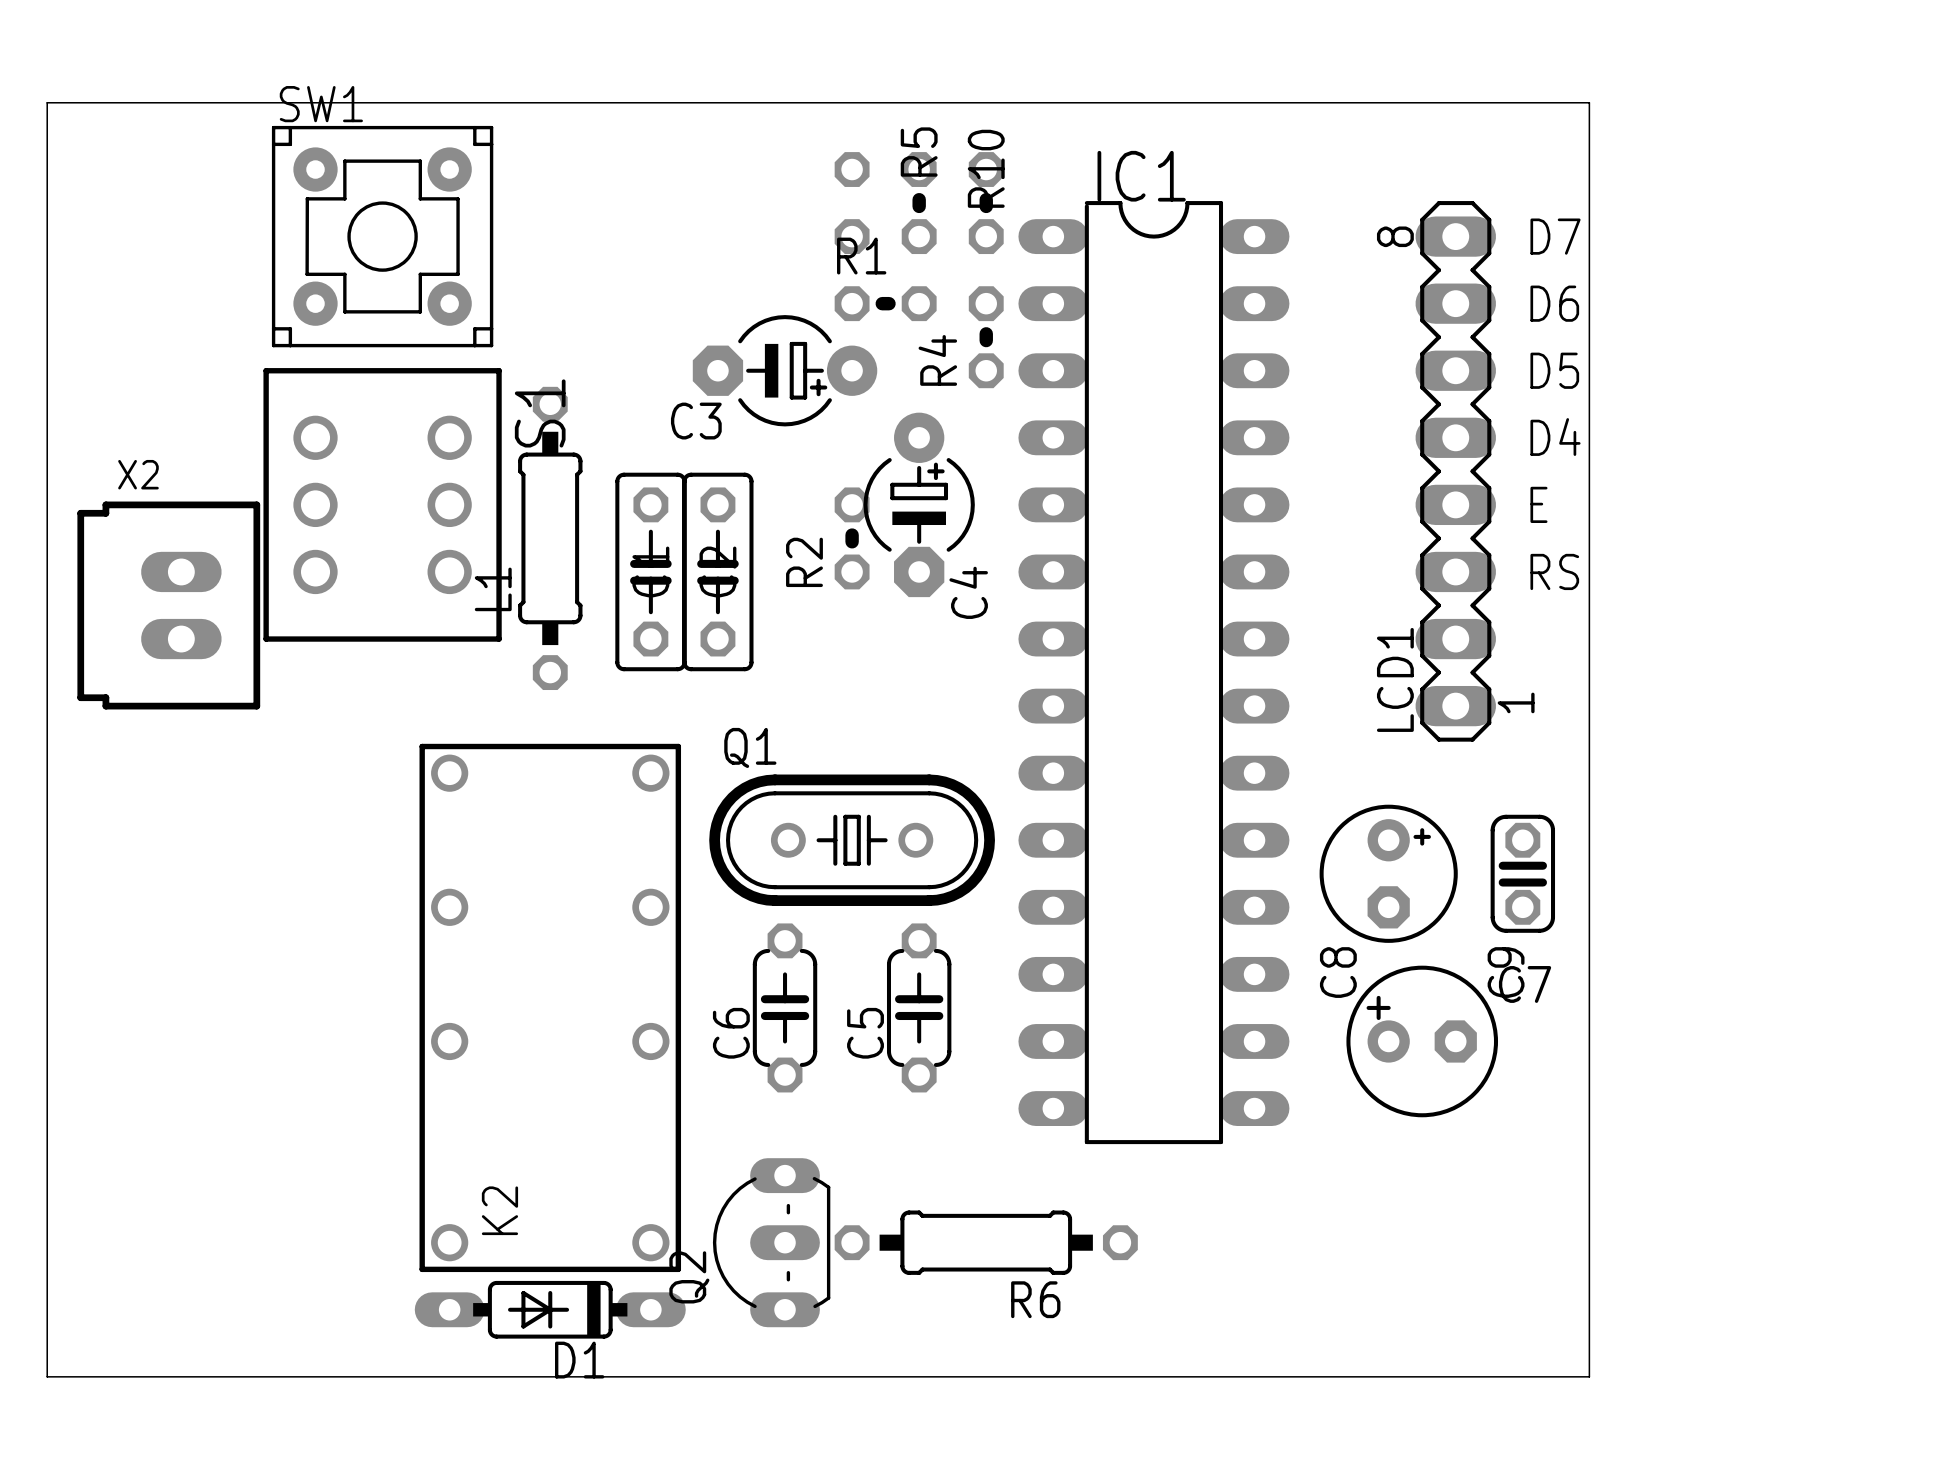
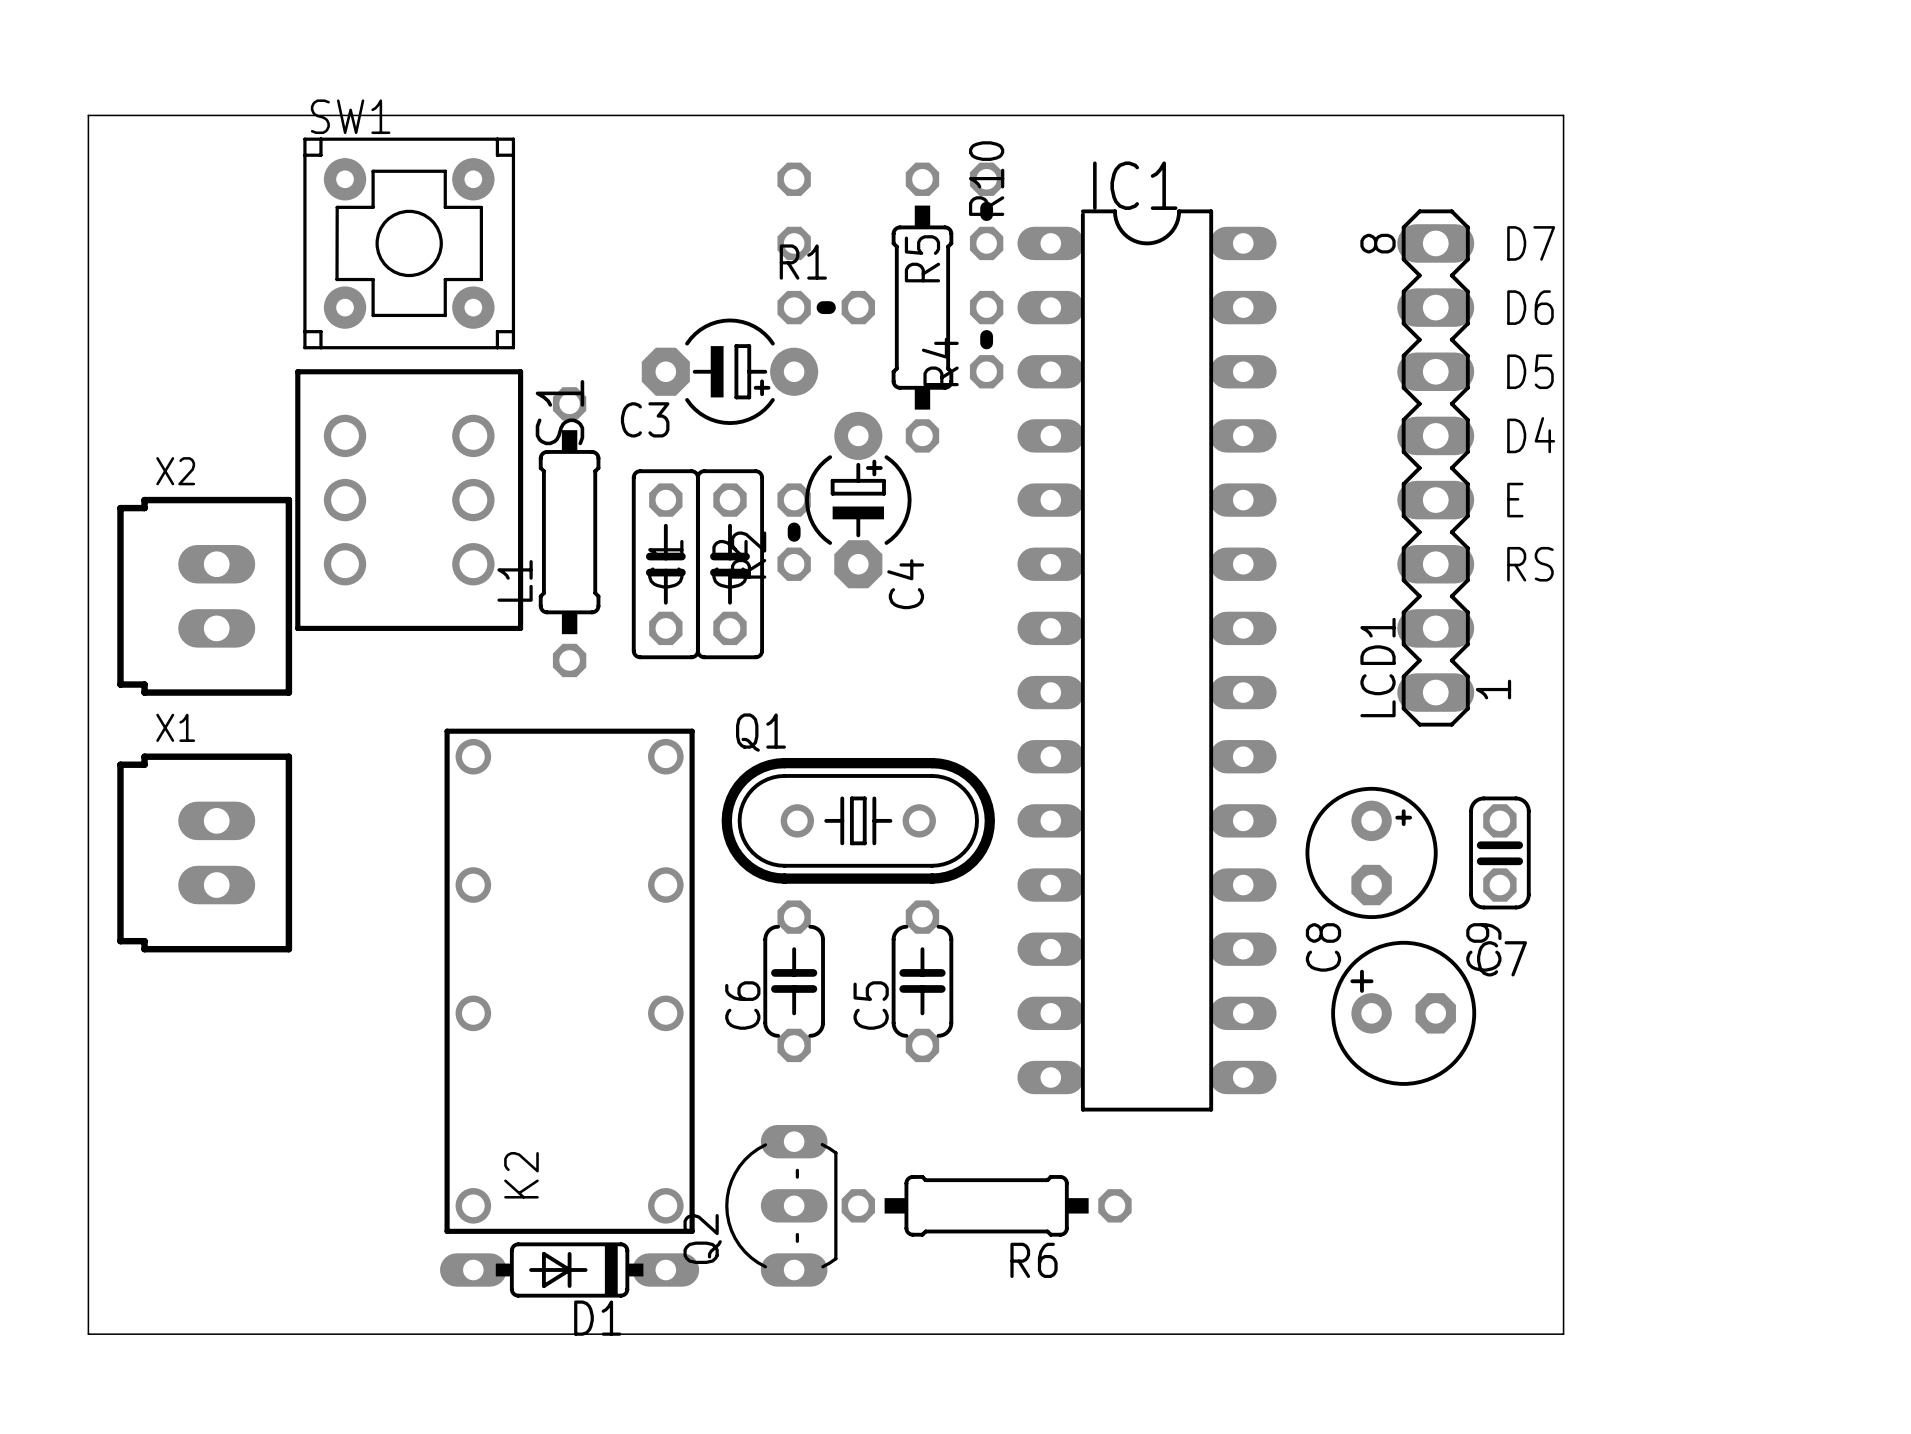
R5 footprint: [901, 152, 937, 255] -> [891, 162, 954, 453]
part position: (852, 203) -> (794, 211)
R1 position: (885, 303) -> (826, 307)
C3 position: (785, 370) -> (729, 371)
C4 position: (919, 504) -> (858, 500)
R2 position: (852, 538) -> (794, 532)
X1: none -> (204, 852)

